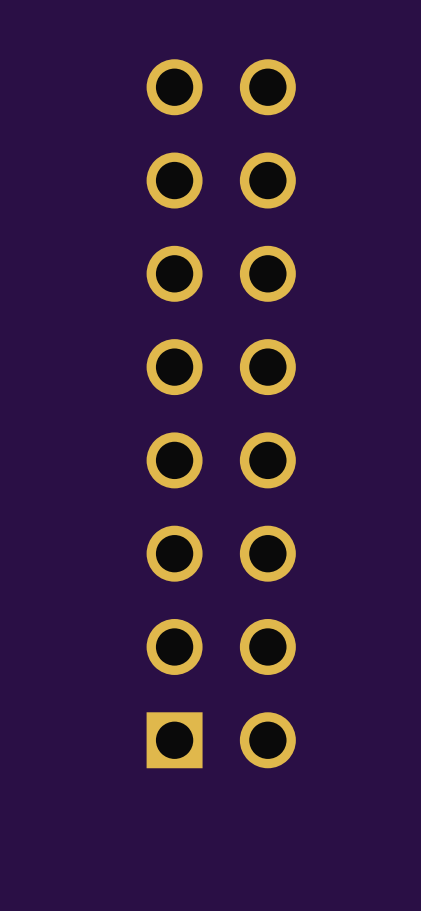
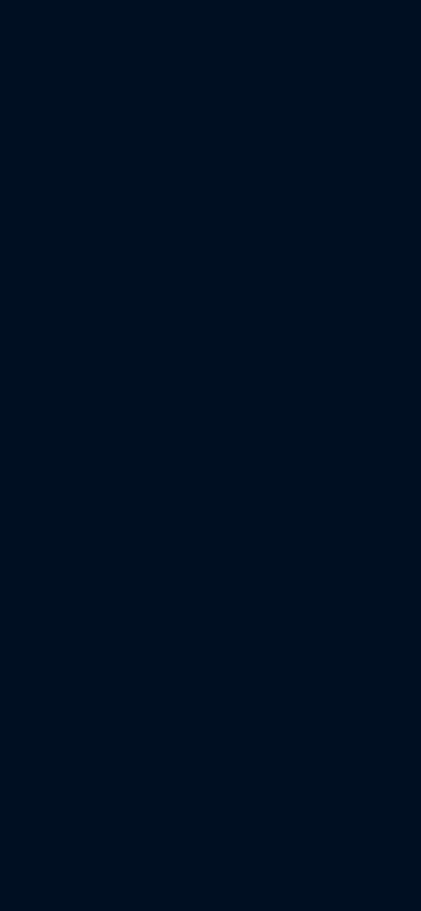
part: (221, 413) -> none

